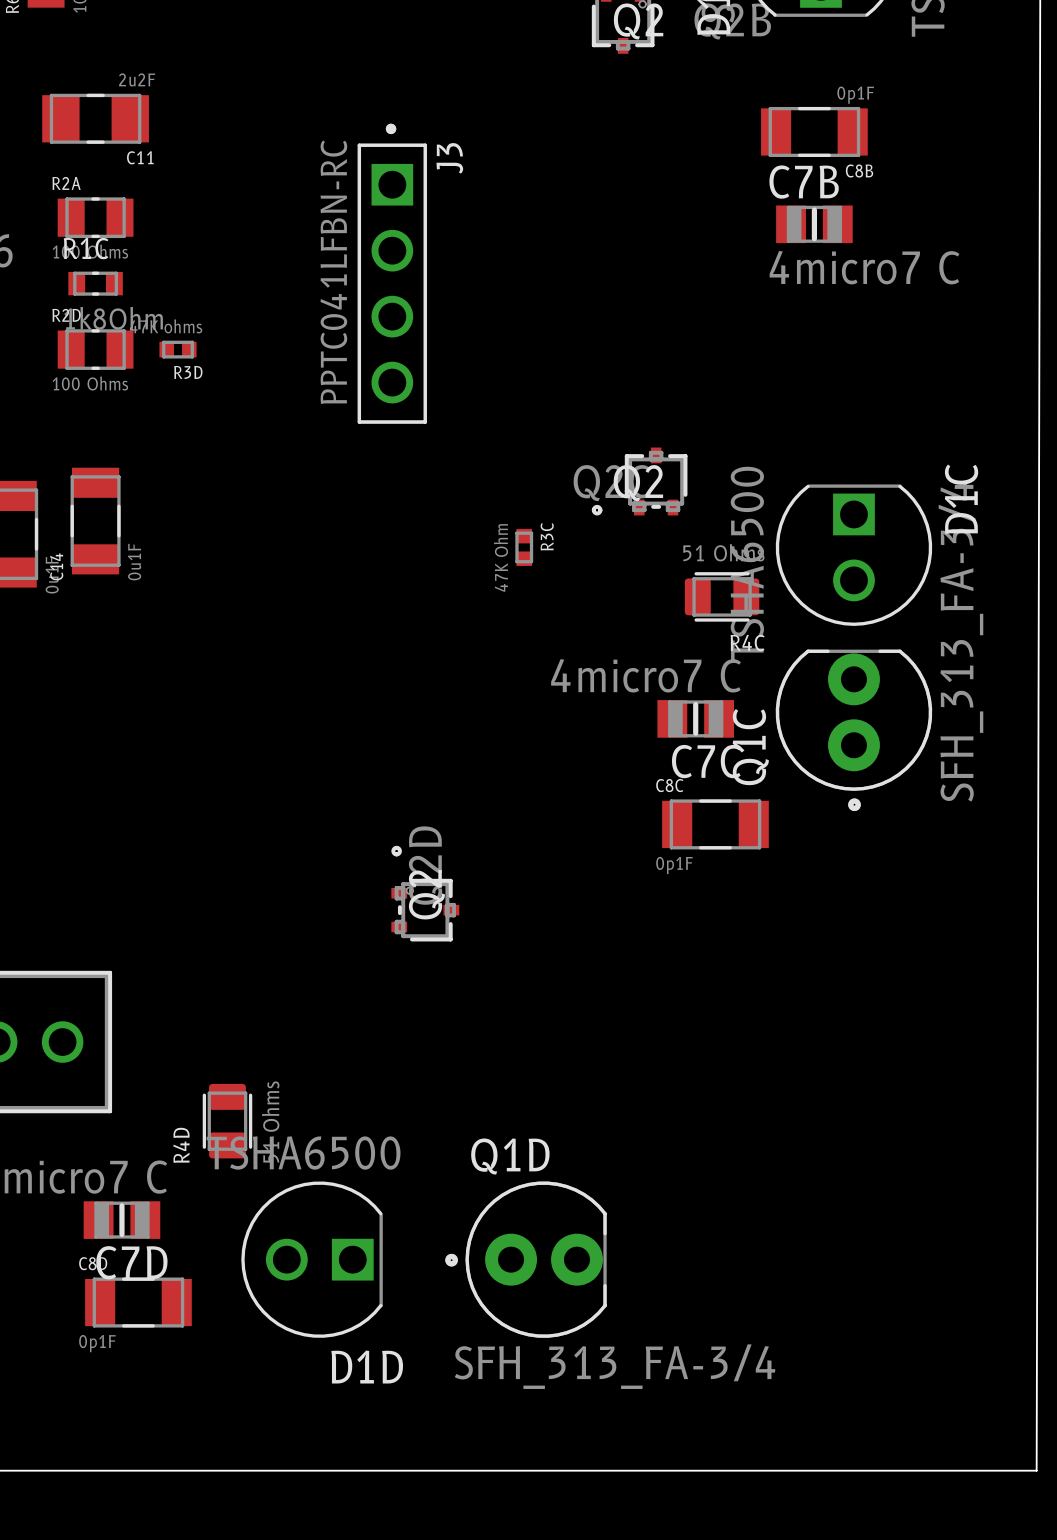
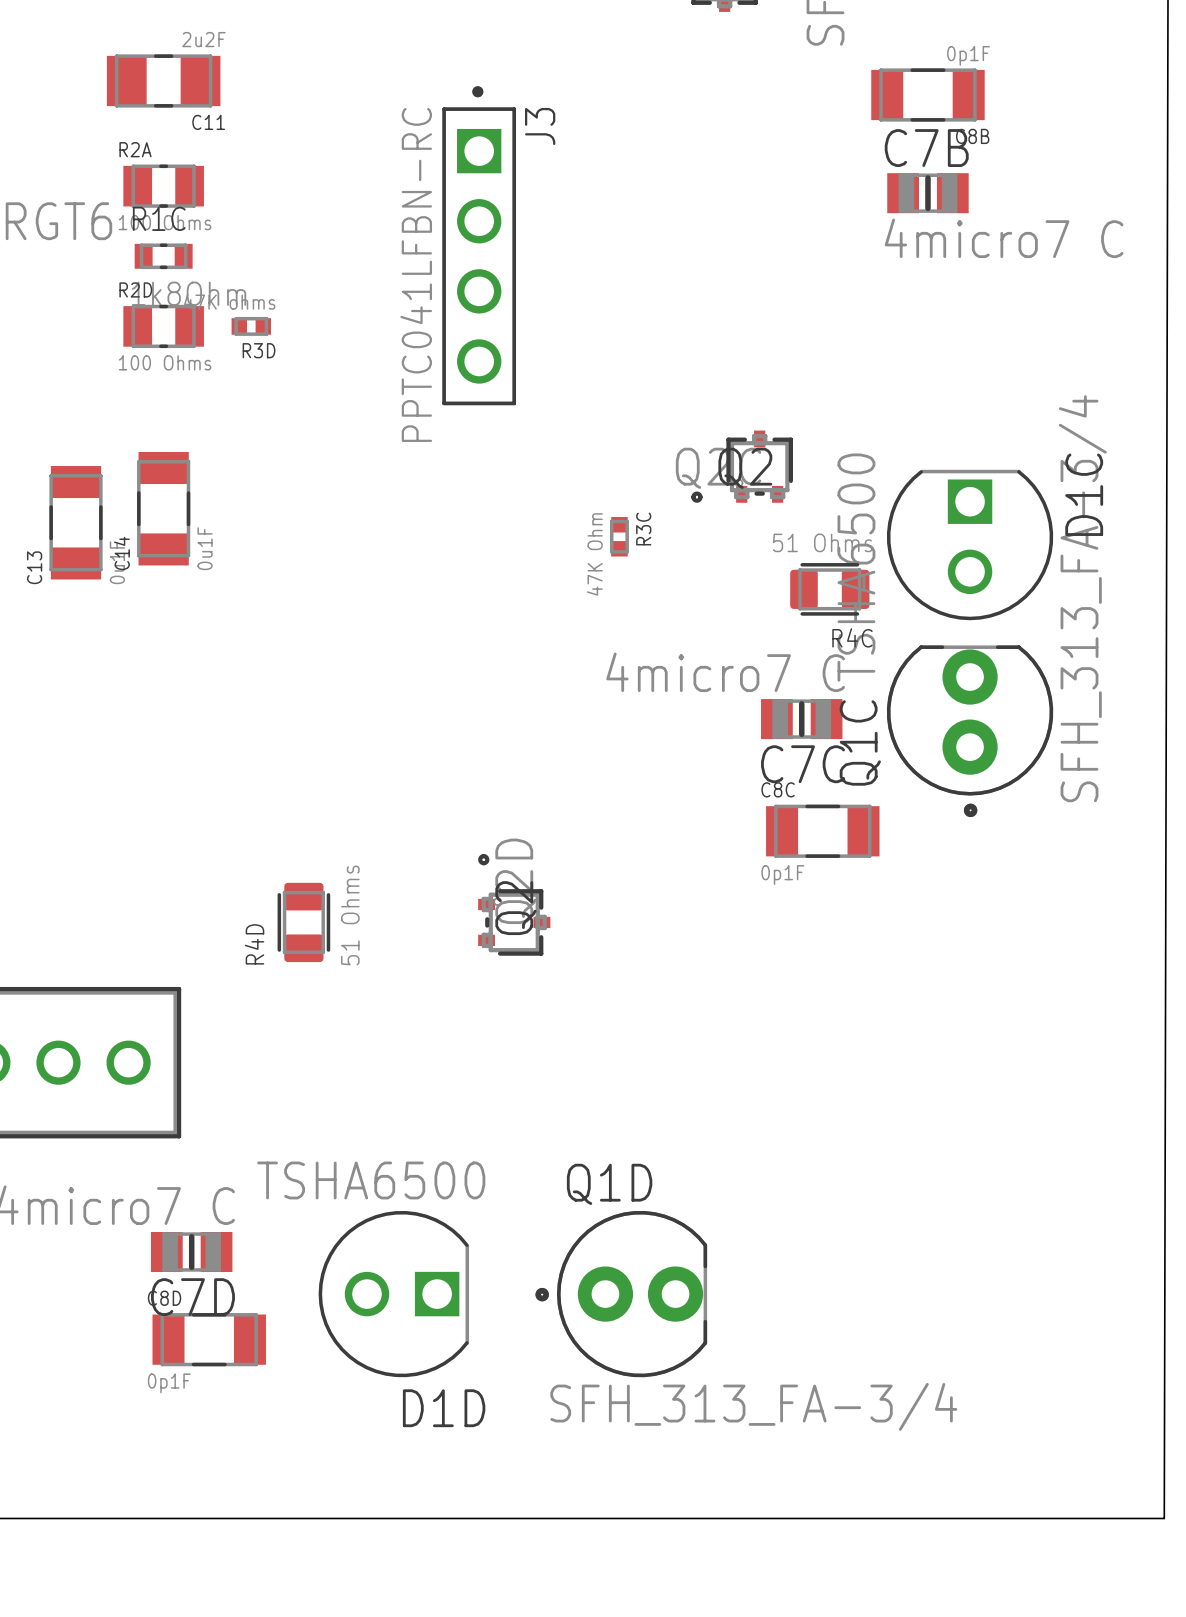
R4D position: (227, 1121) -> (303, 922)

